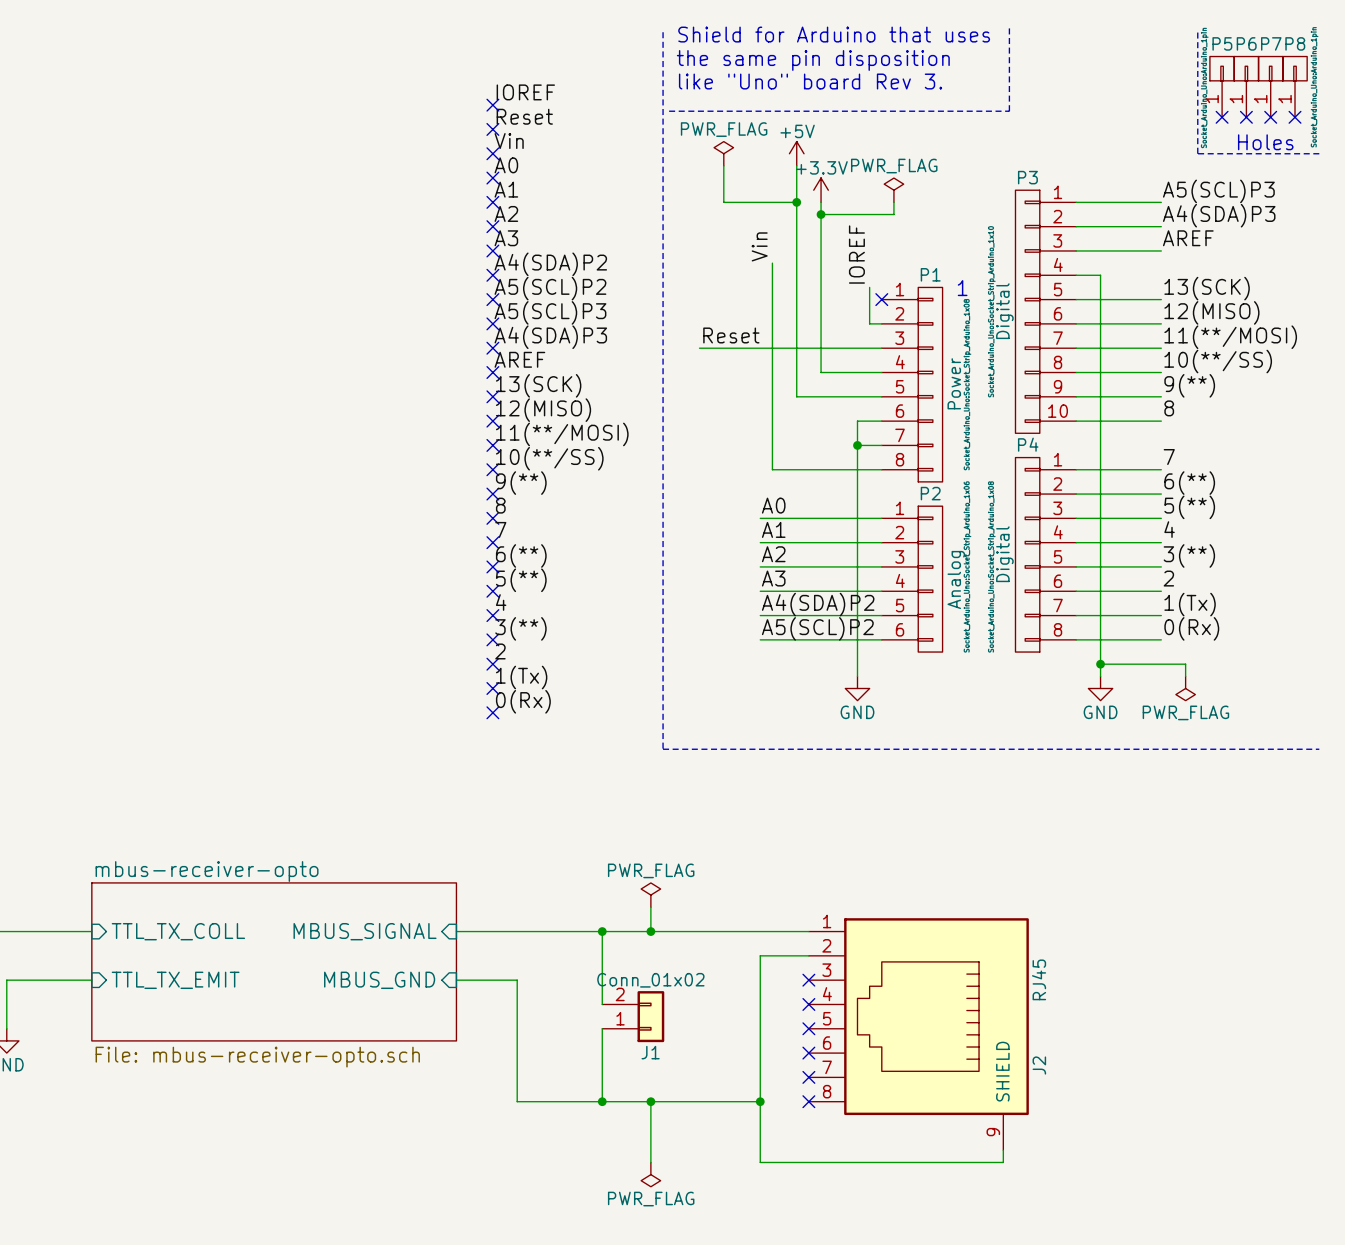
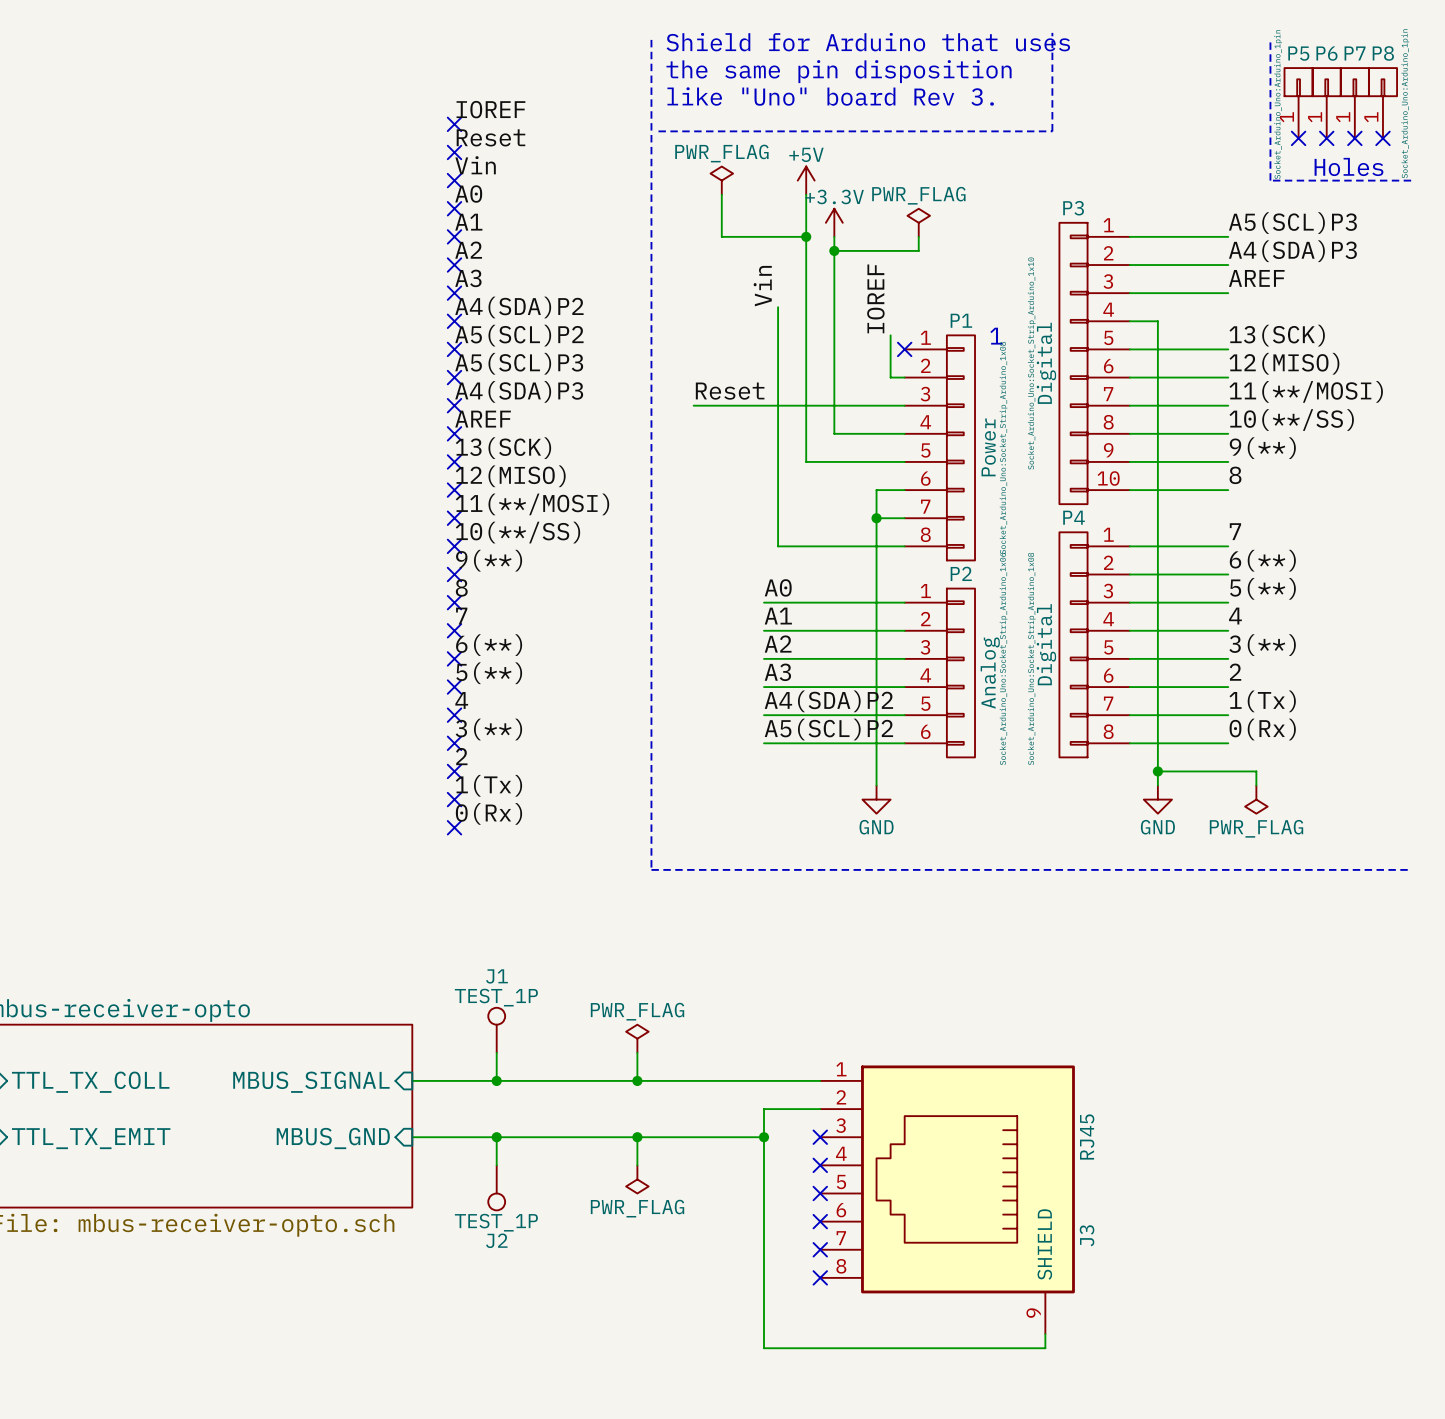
wire: none -> (496, 1052) (496, 1080)
junction: none -> (496, 1080)
wire: (602, 931) (602, 1004) -> none
junction: (602, 931) -> none
wire: (517, 980) (517, 1101) (760, 1101) -> (482, 1137) (764, 1137)
wire: none -> (496, 1137) (496, 1165)
junction: none -> (496, 1137)
J1 value: Conn_01x02 (650, 980) -> TEST_1P (496, 997)
junction: none -> (637, 1137)
junction: none -> (764, 1137)
J1 symbol: [602, 991, 665, 1043] -> [488, 1007, 506, 1053]
J2: none -> TEST_1P (496, 1187)
wire: (602, 1028) (602, 1101) -> none
J1 name position: J1 (650, 1052) -> J1 (496, 976)
J2 name: J2 (1039, 1065) -> J3 (1087, 1235)
junction: (602, 1101) -> none
wire: (650, 1101) (650, 1162) -> none
junction: (650, 1101) -> none
junction: (760, 1101) -> none
power symbol position: PWR_FLAG (650, 1174) -> PWR_FLAG (637, 1179)

